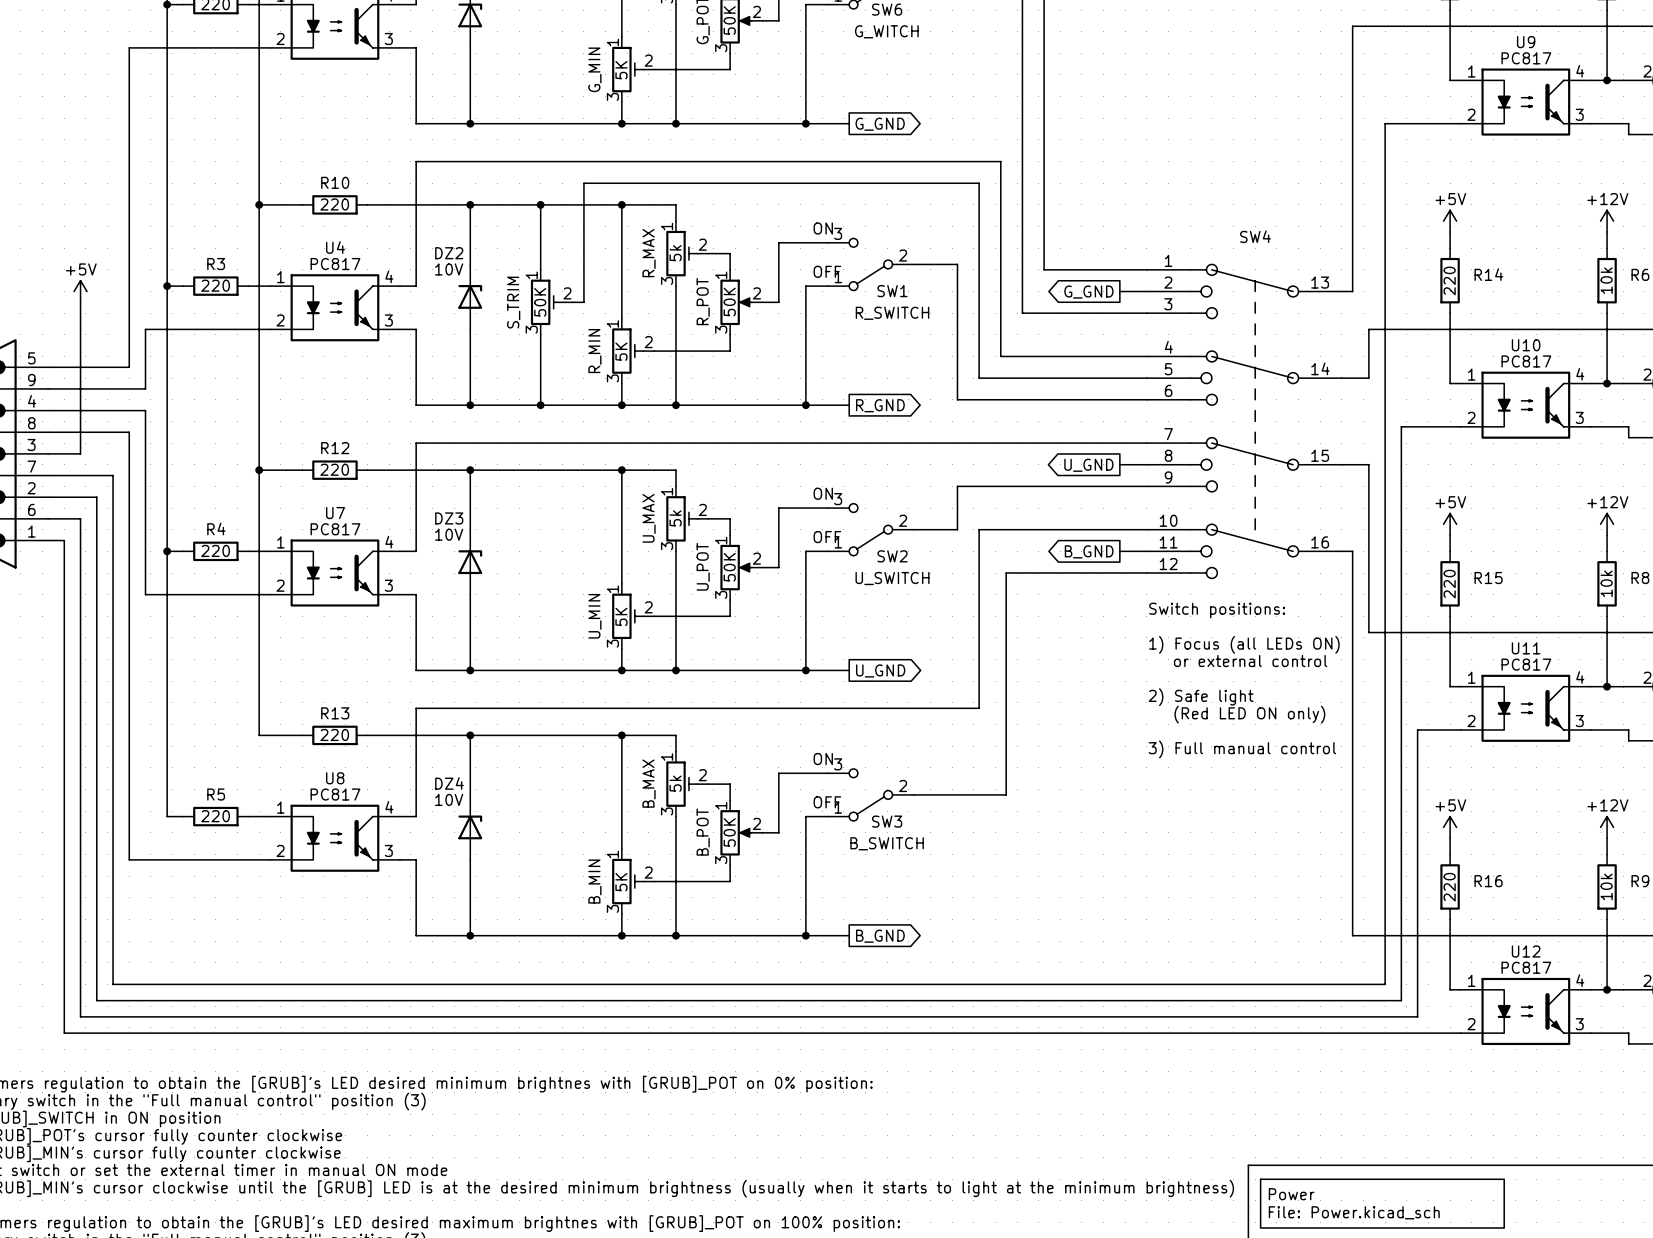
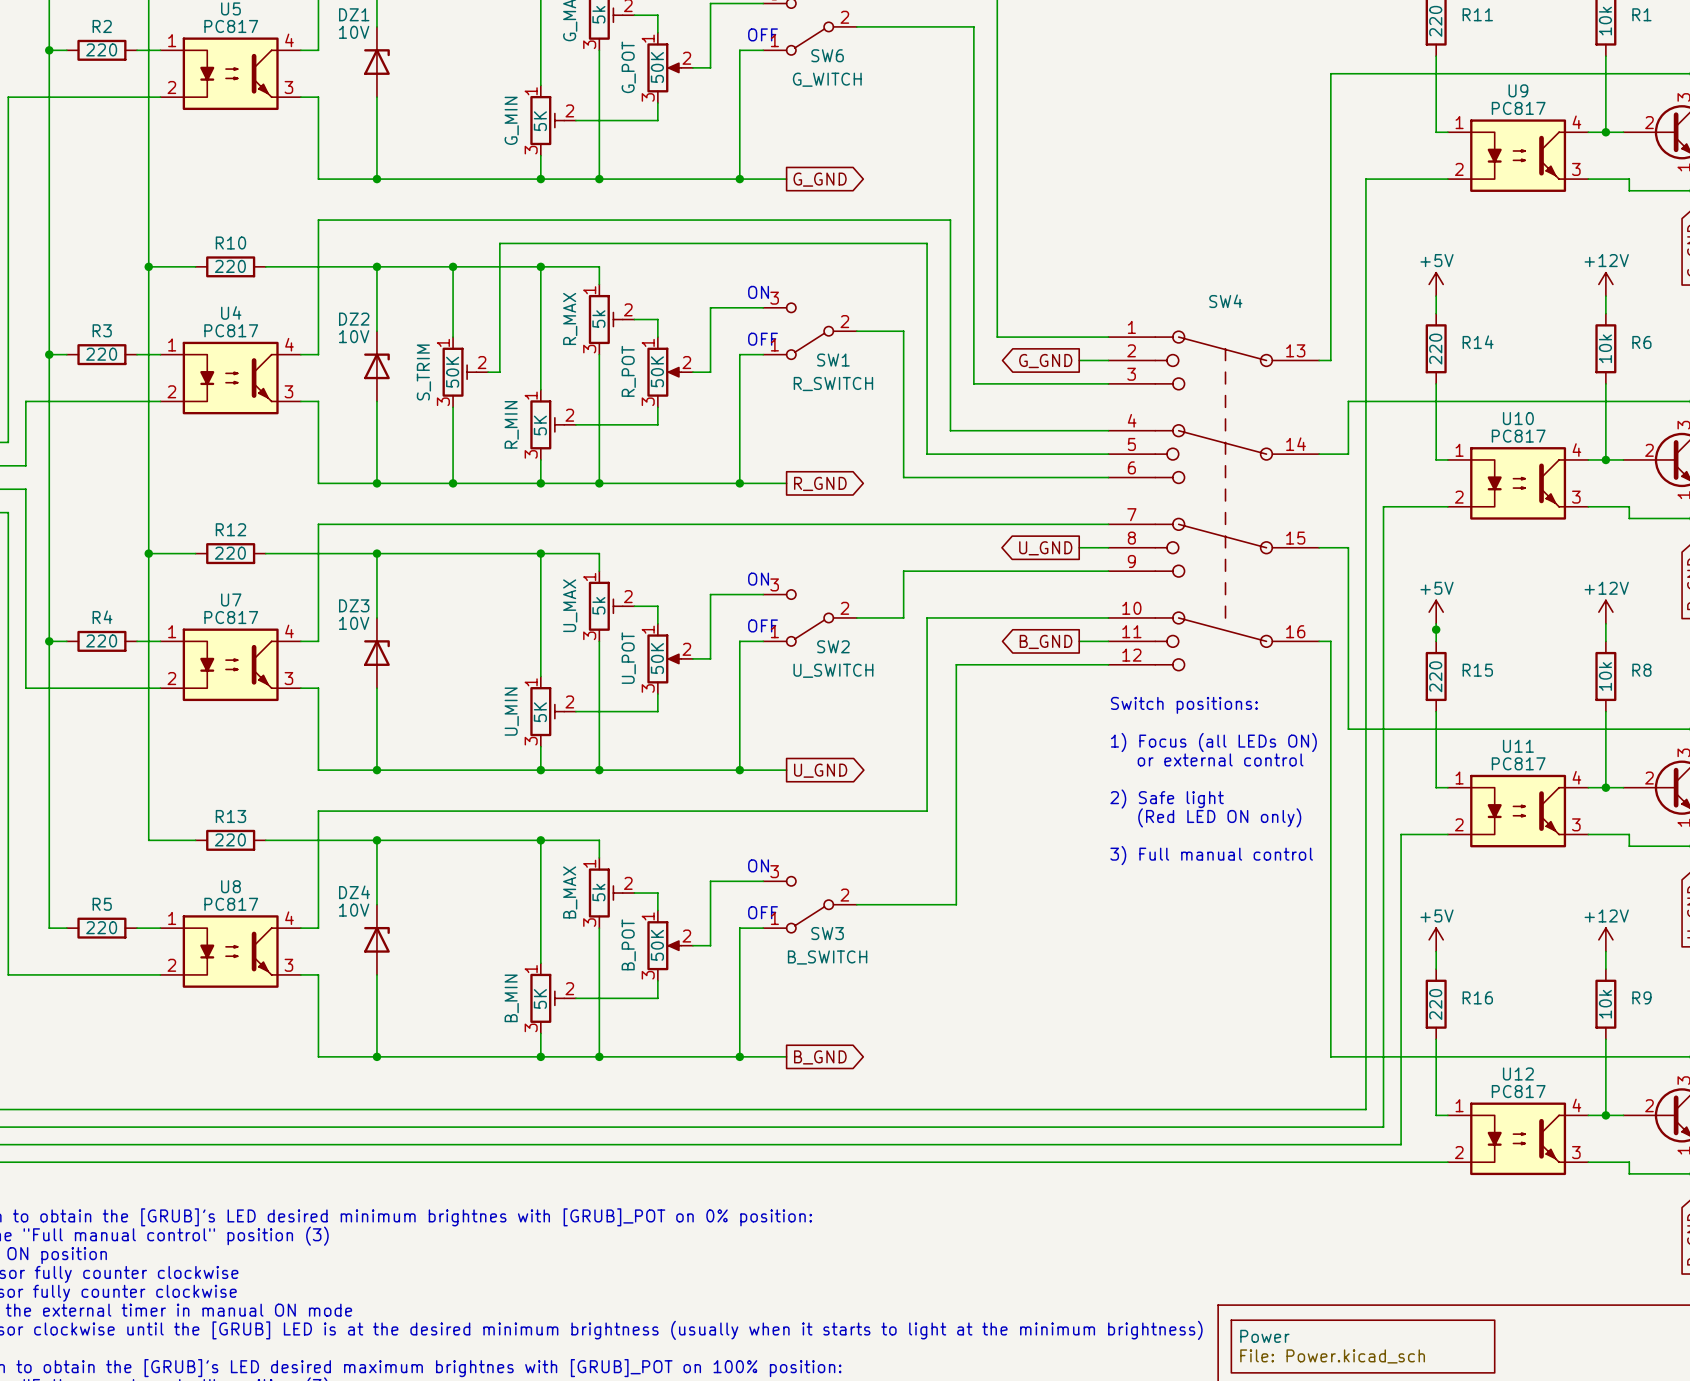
junction: none -> (1436, 629)

